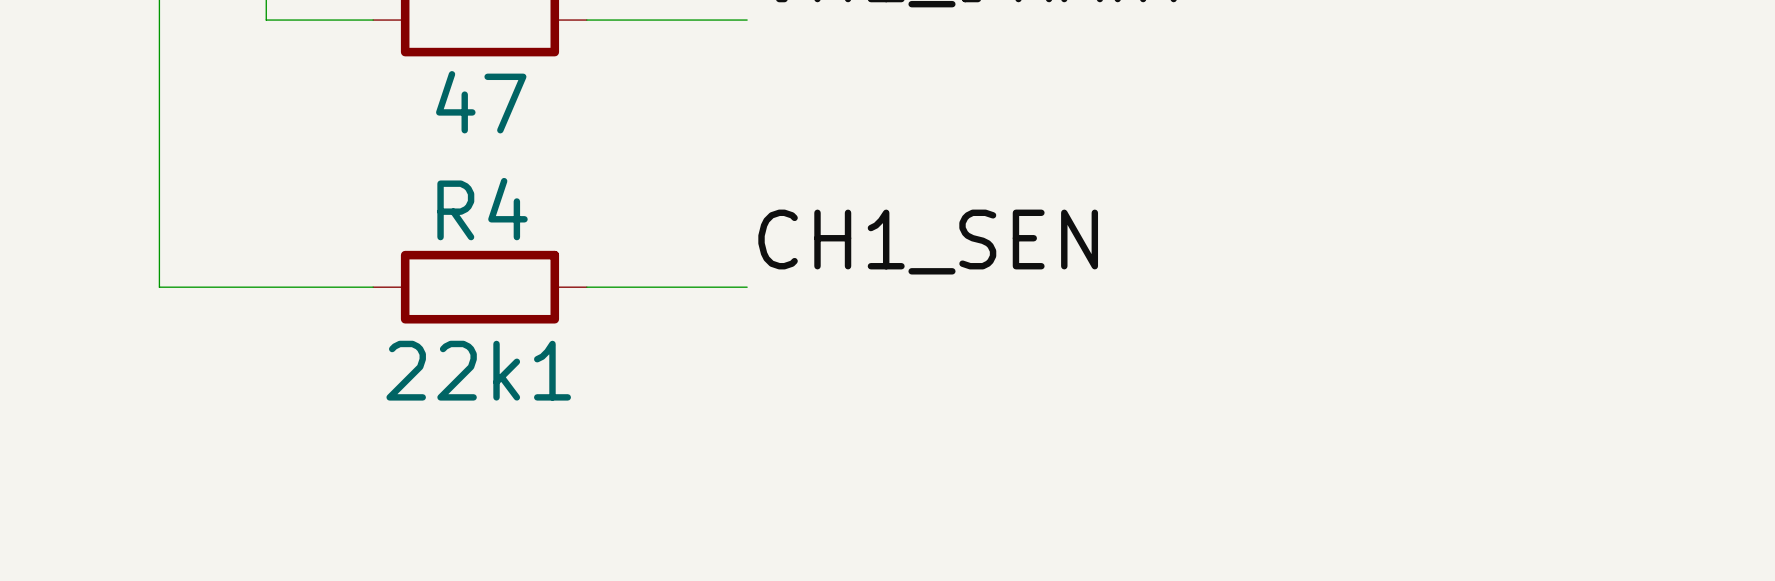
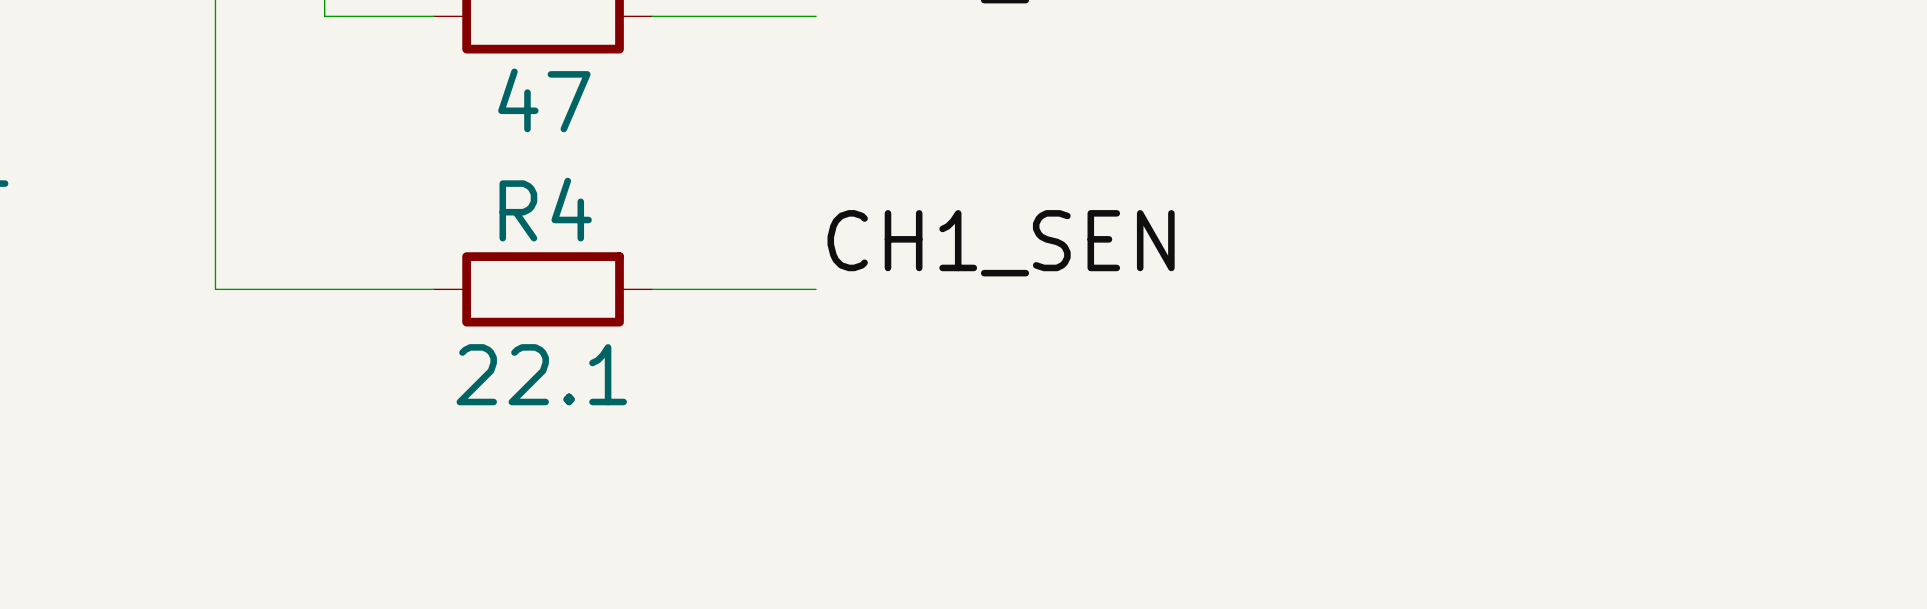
R4 value: 22k1 (478, 370) -> 22.1 (541, 374)

